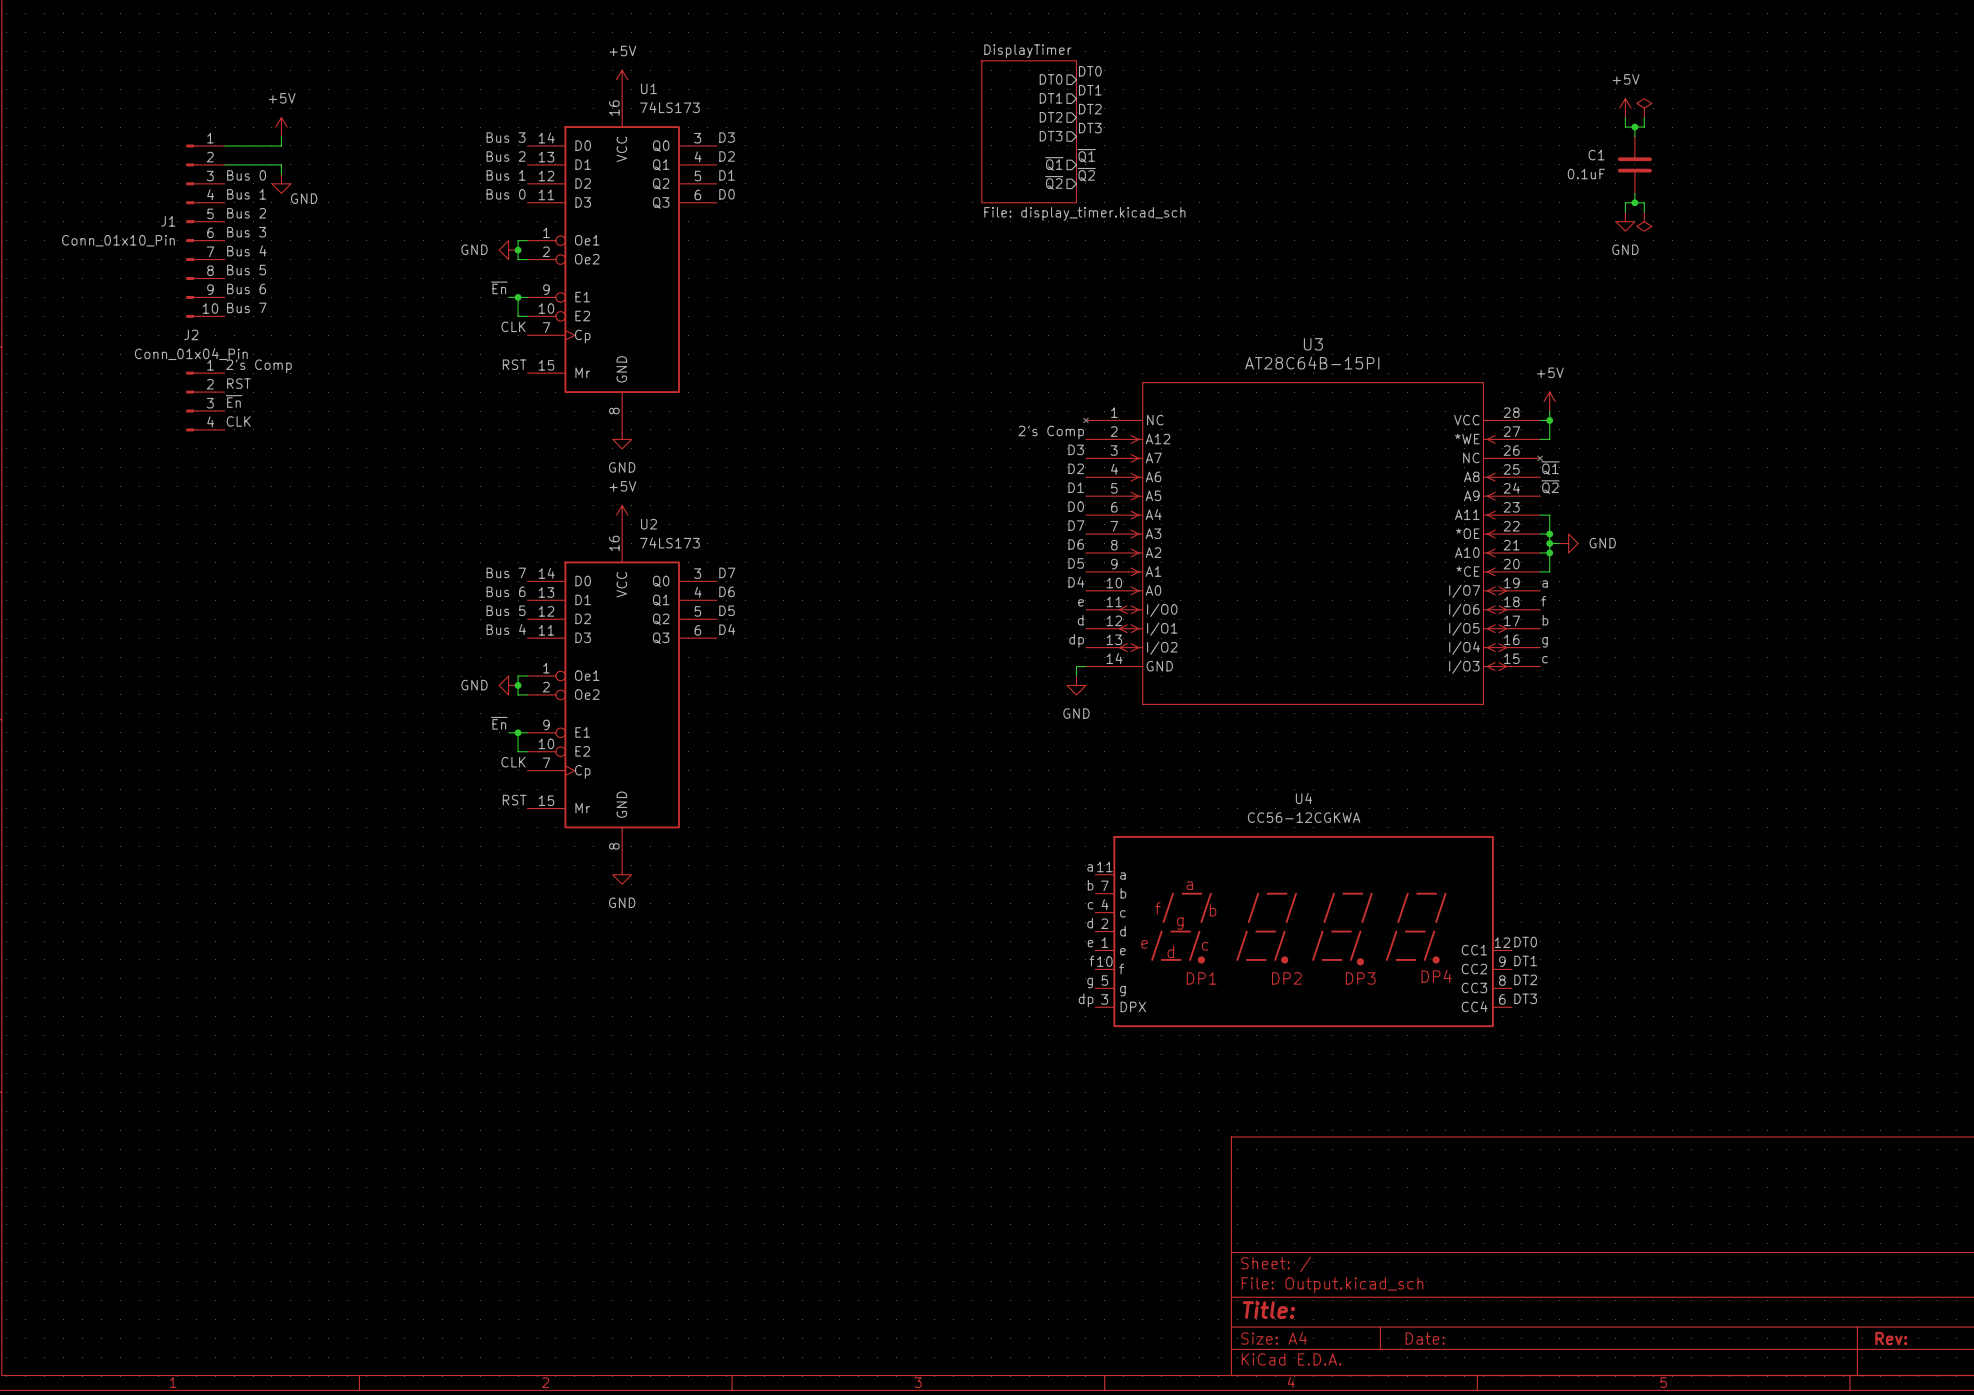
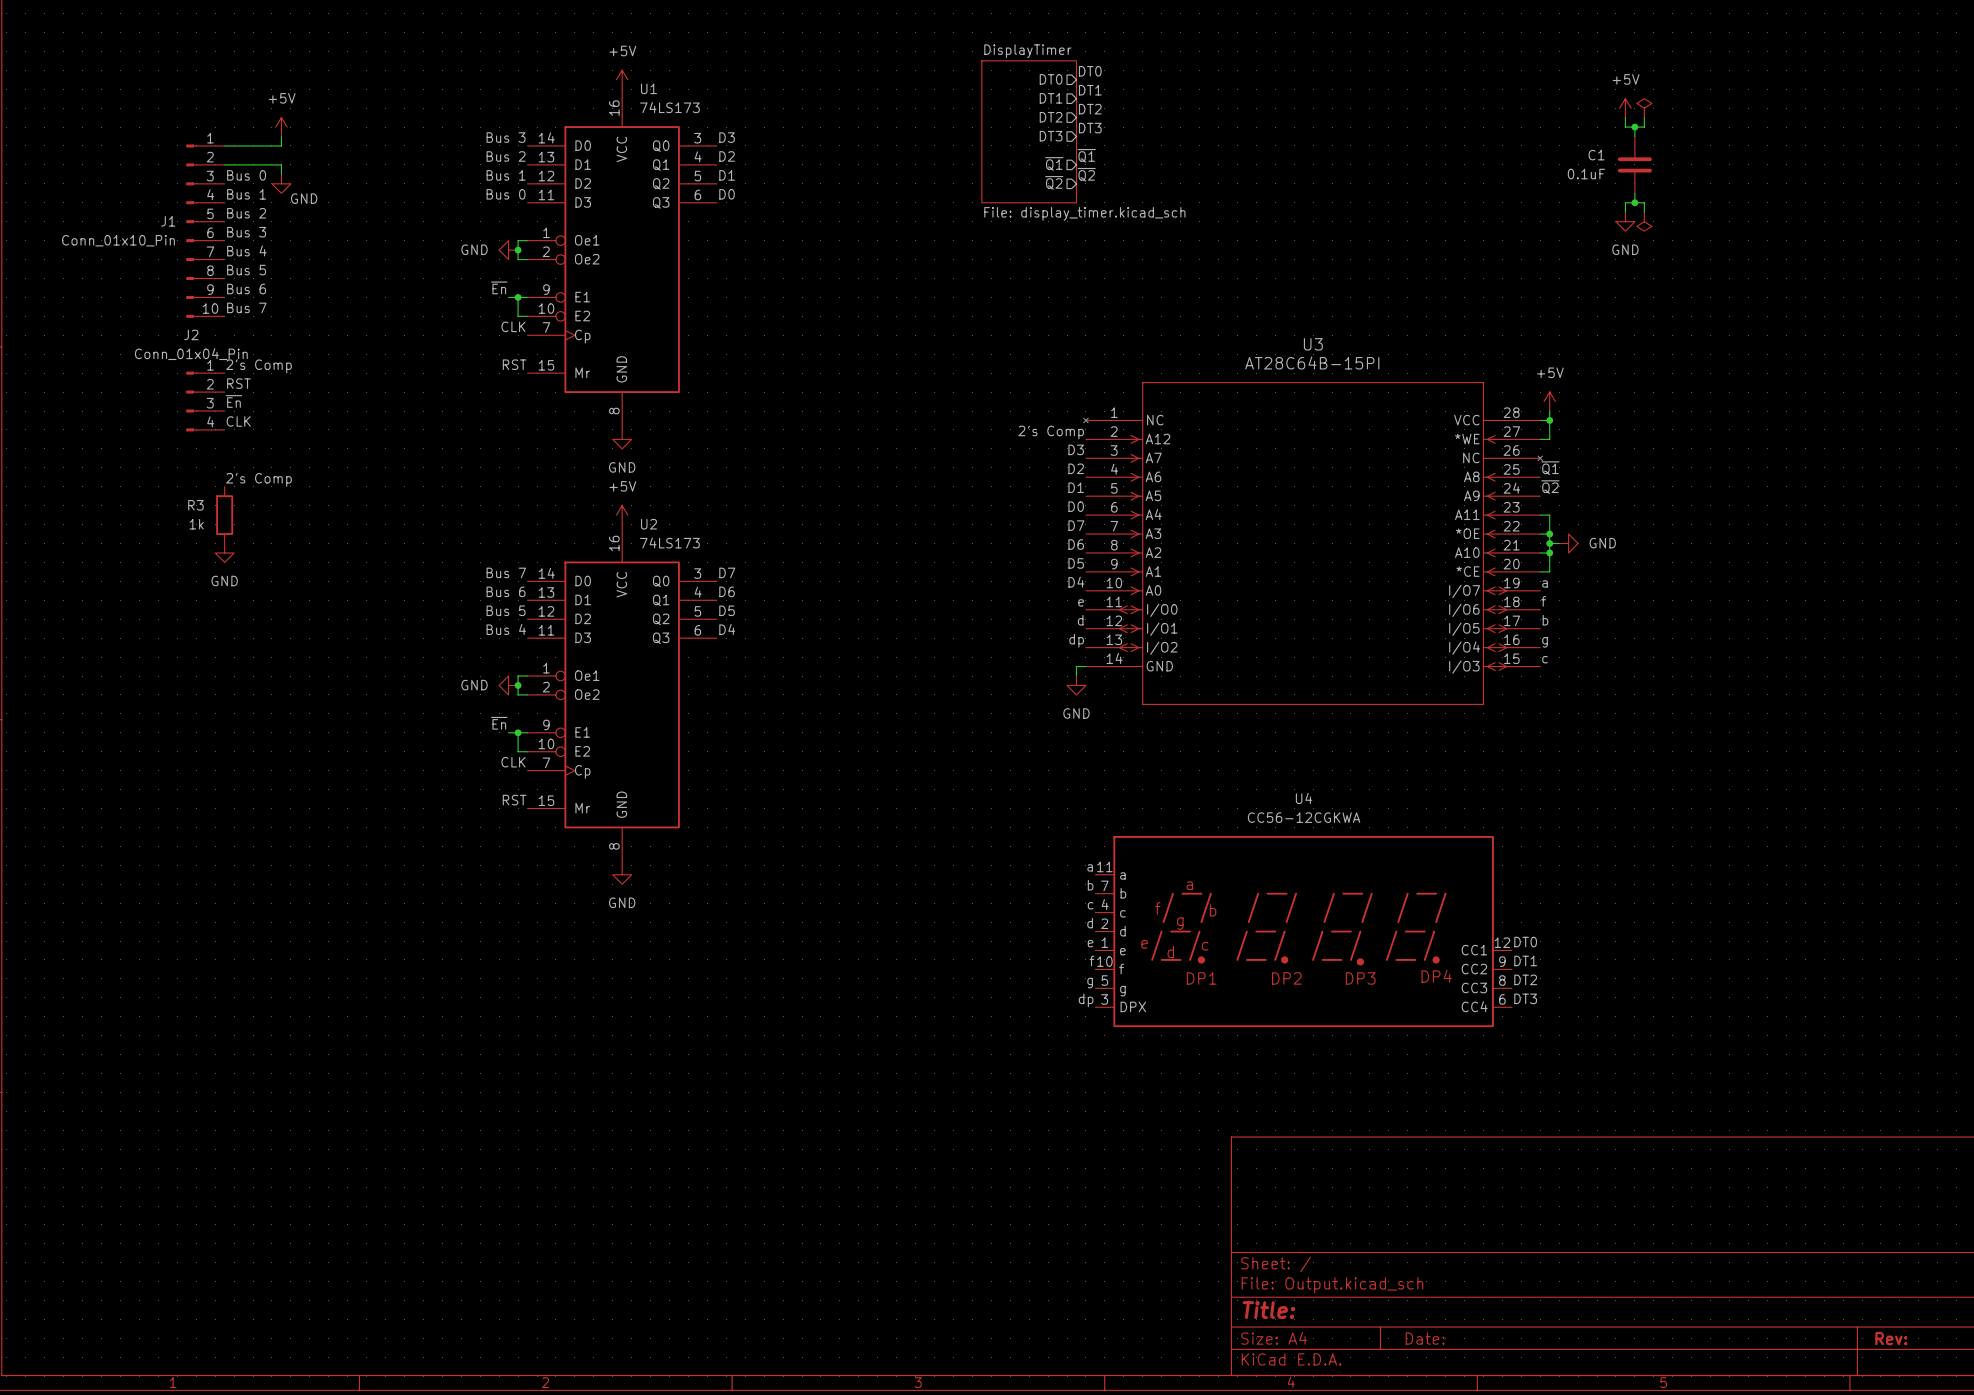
label: none -> 2's Comp (258, 479)
R3: none -> 1k (224, 515)
power symbol: none -> GND (224, 552)

